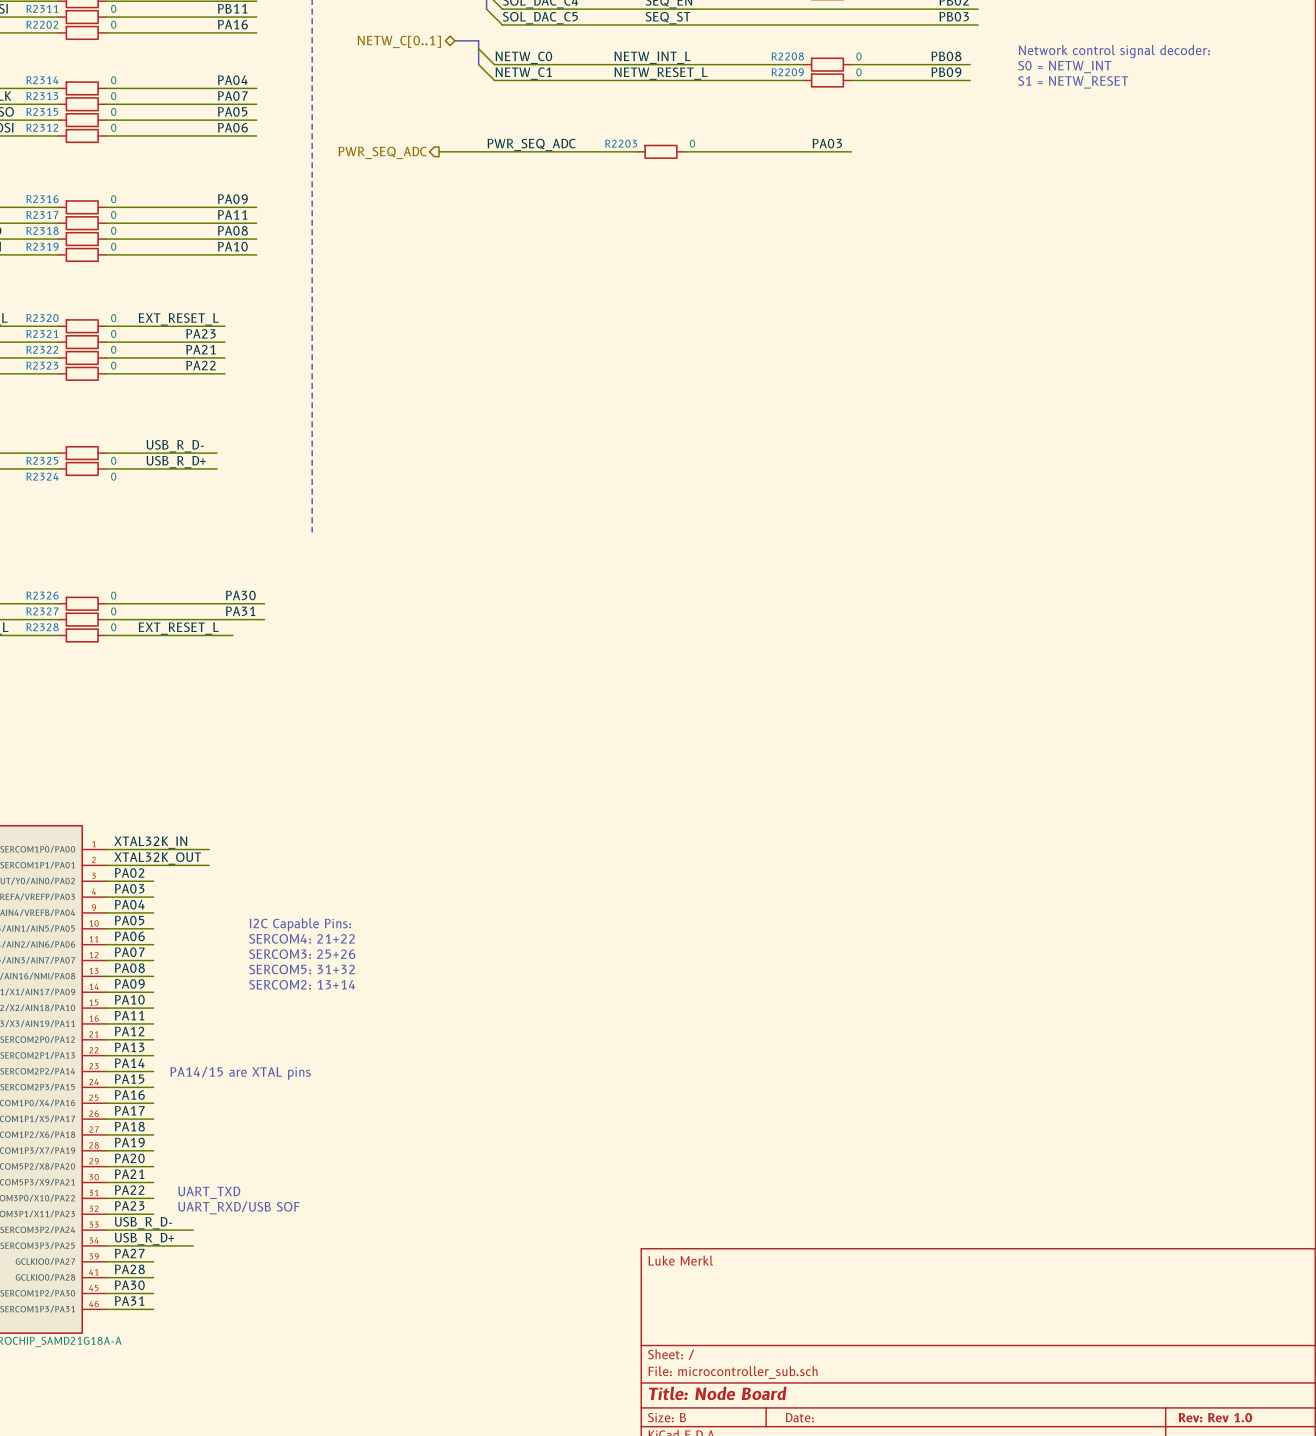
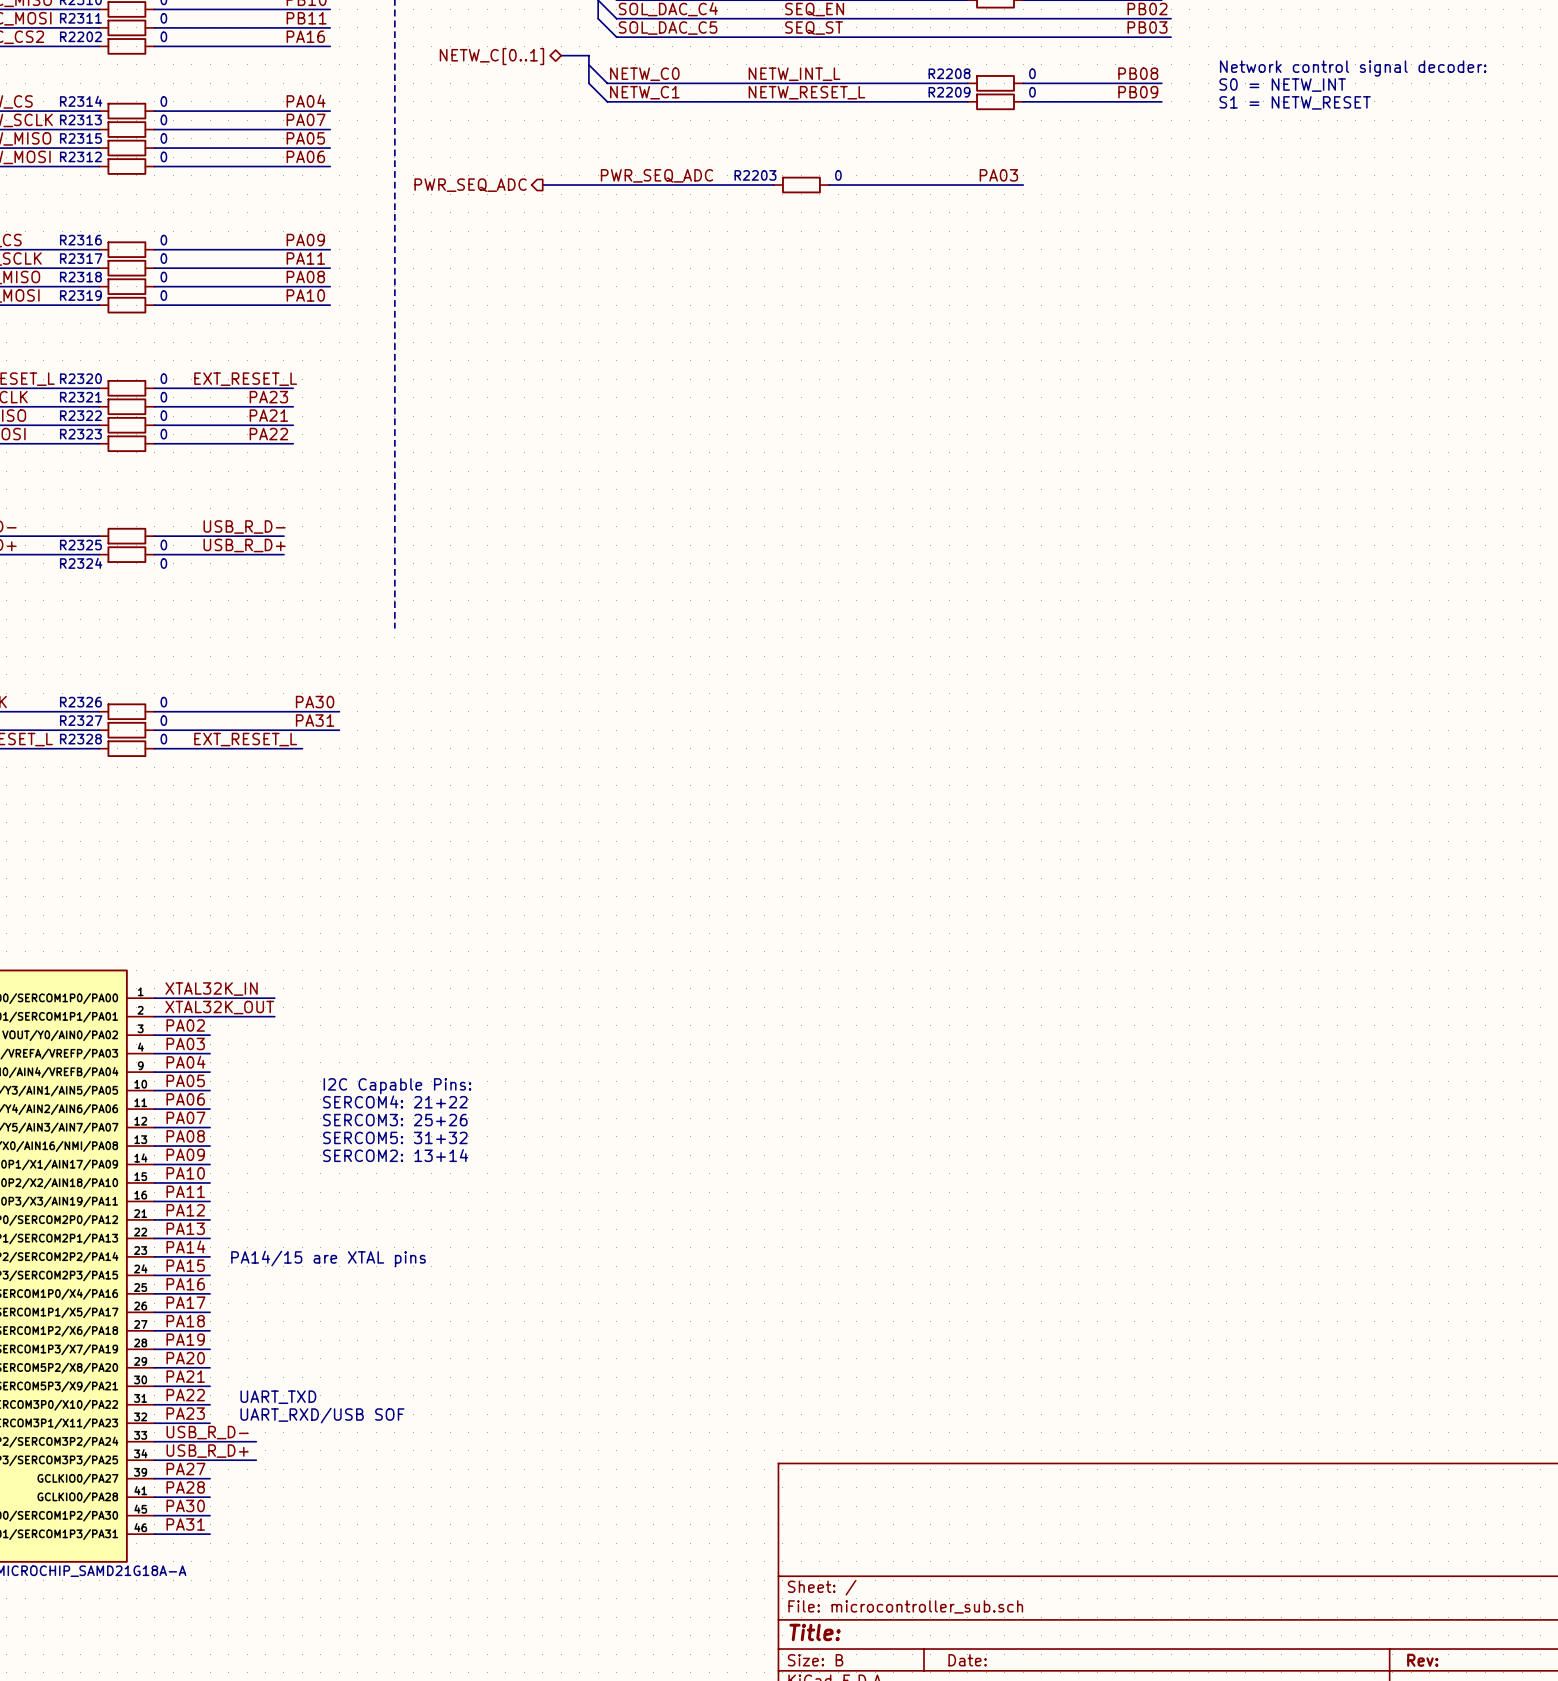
title block: Luke Merkl (680, 1260) -> none
title block: Title: Node Board (717, 1393) -> Title: (815, 1632)
title block: Rev: Rev 1.0 (1215, 1417) -> Rev: (1422, 1660)

